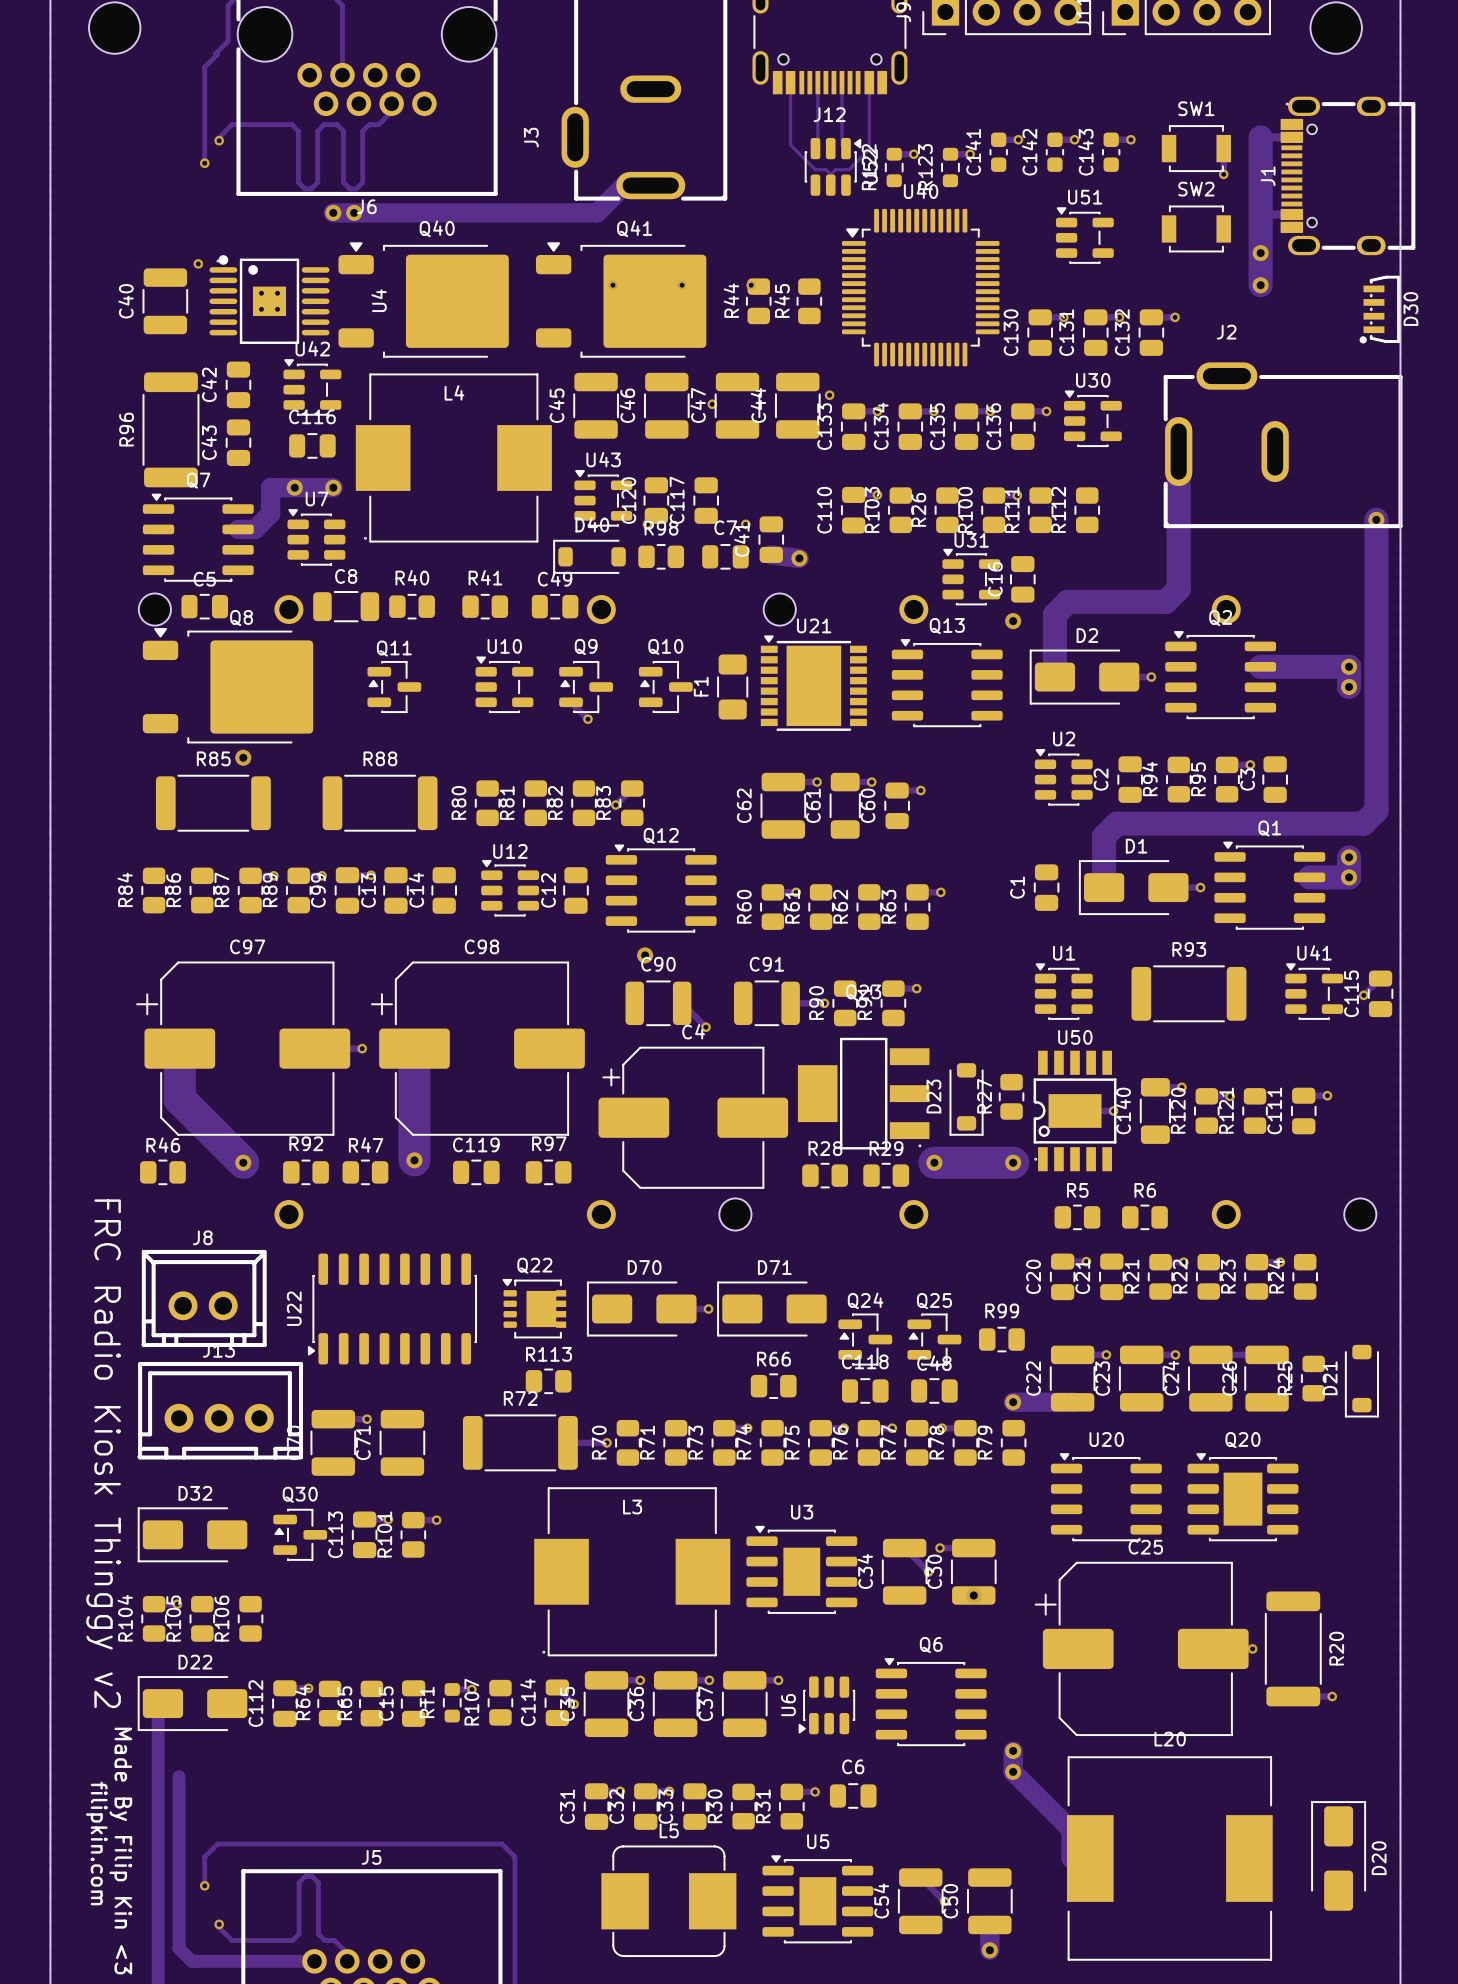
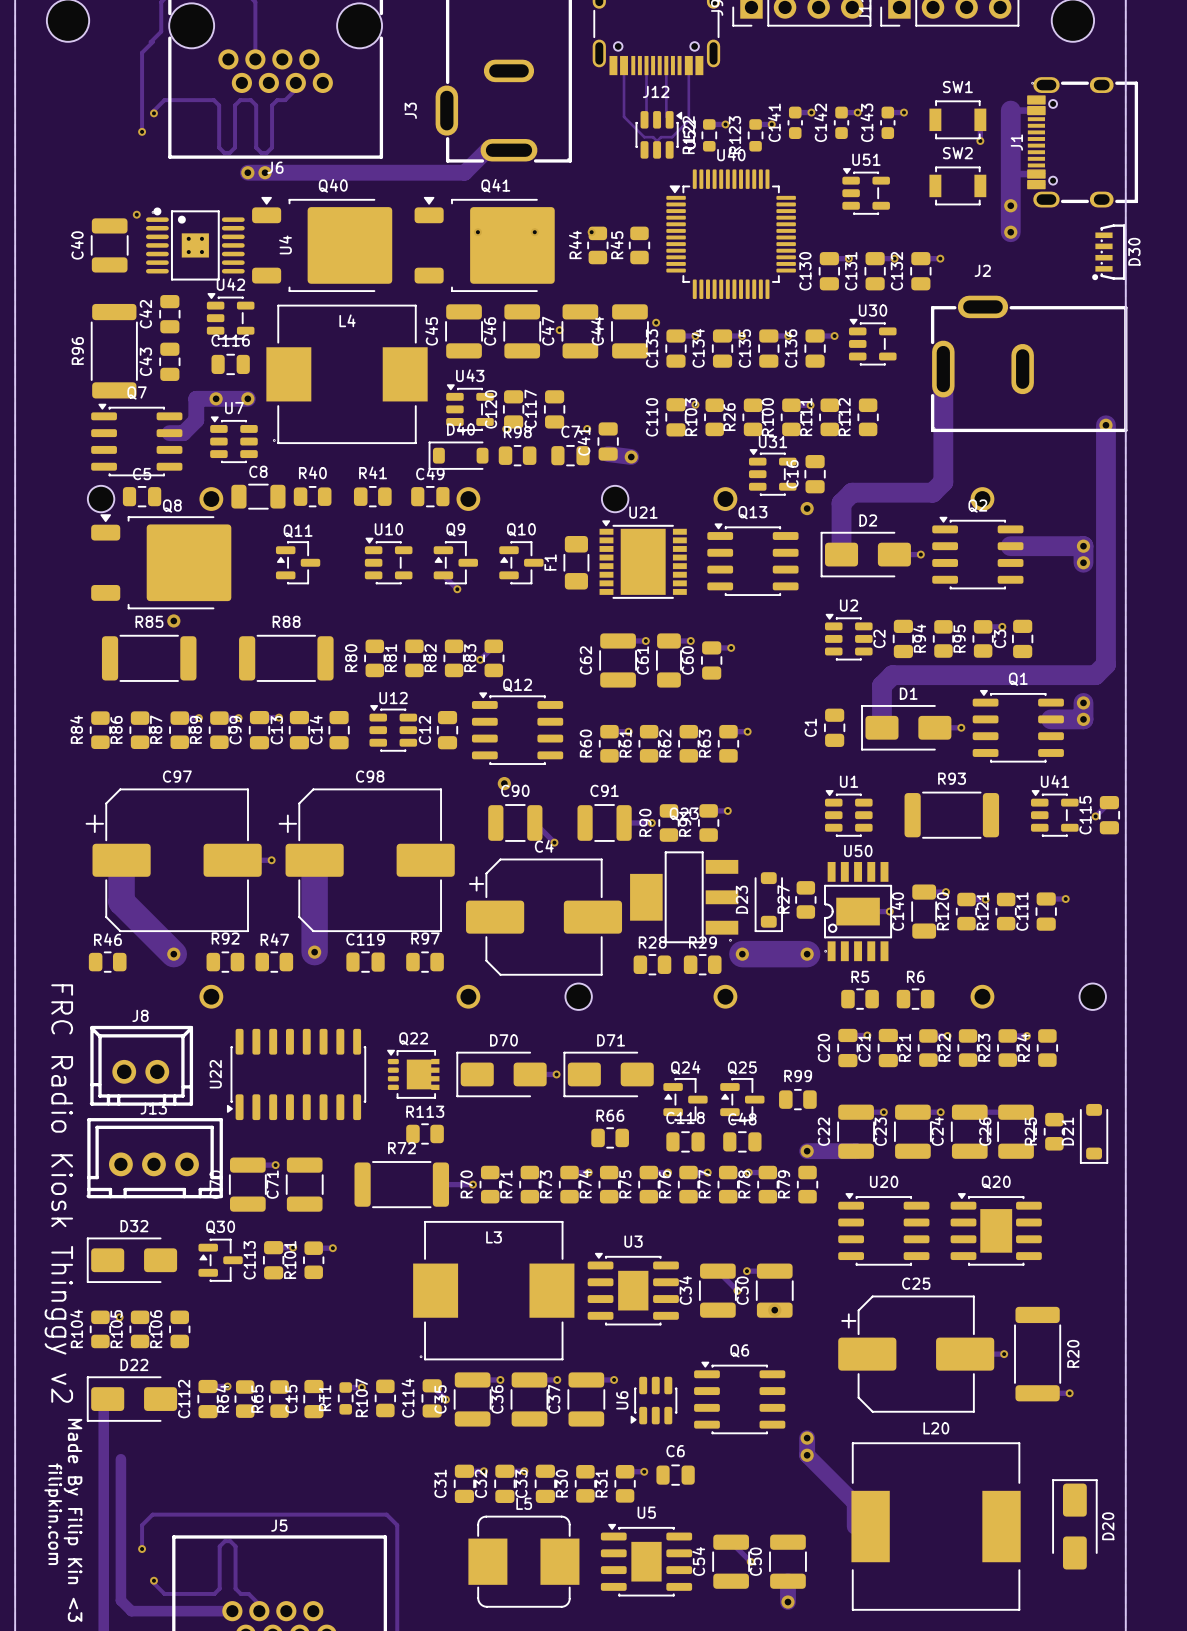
C25 footprint: [1034, 1561, 1249, 1737] -> [838, 1295, 995, 1413]

